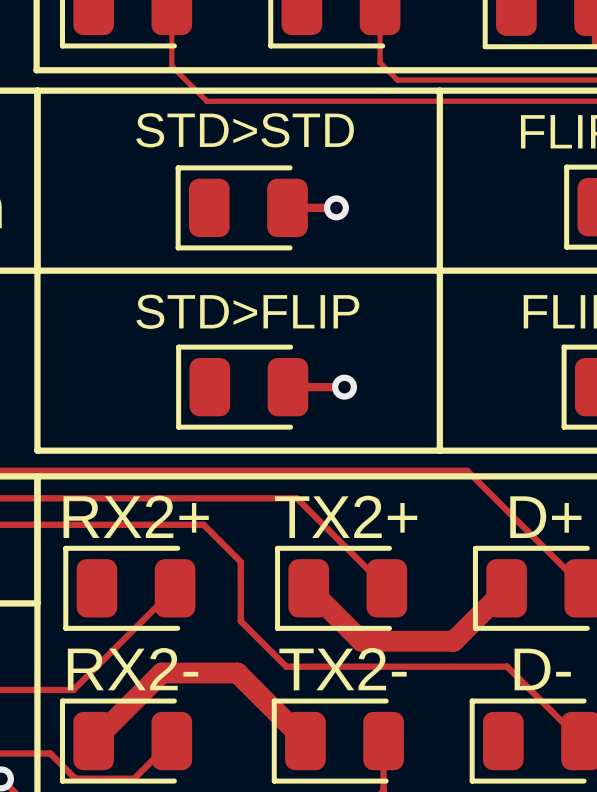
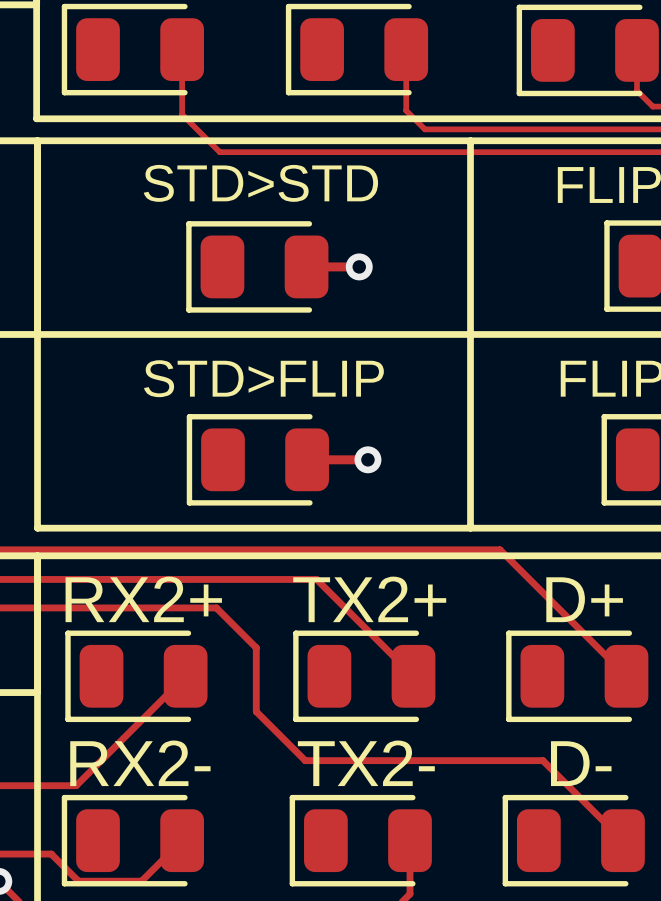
track: (308, 588) (361, 641) (453, 641) (506, 588) -> none
track: (93, 741) (161, 673) (237, 673) (305, 741) -> none

